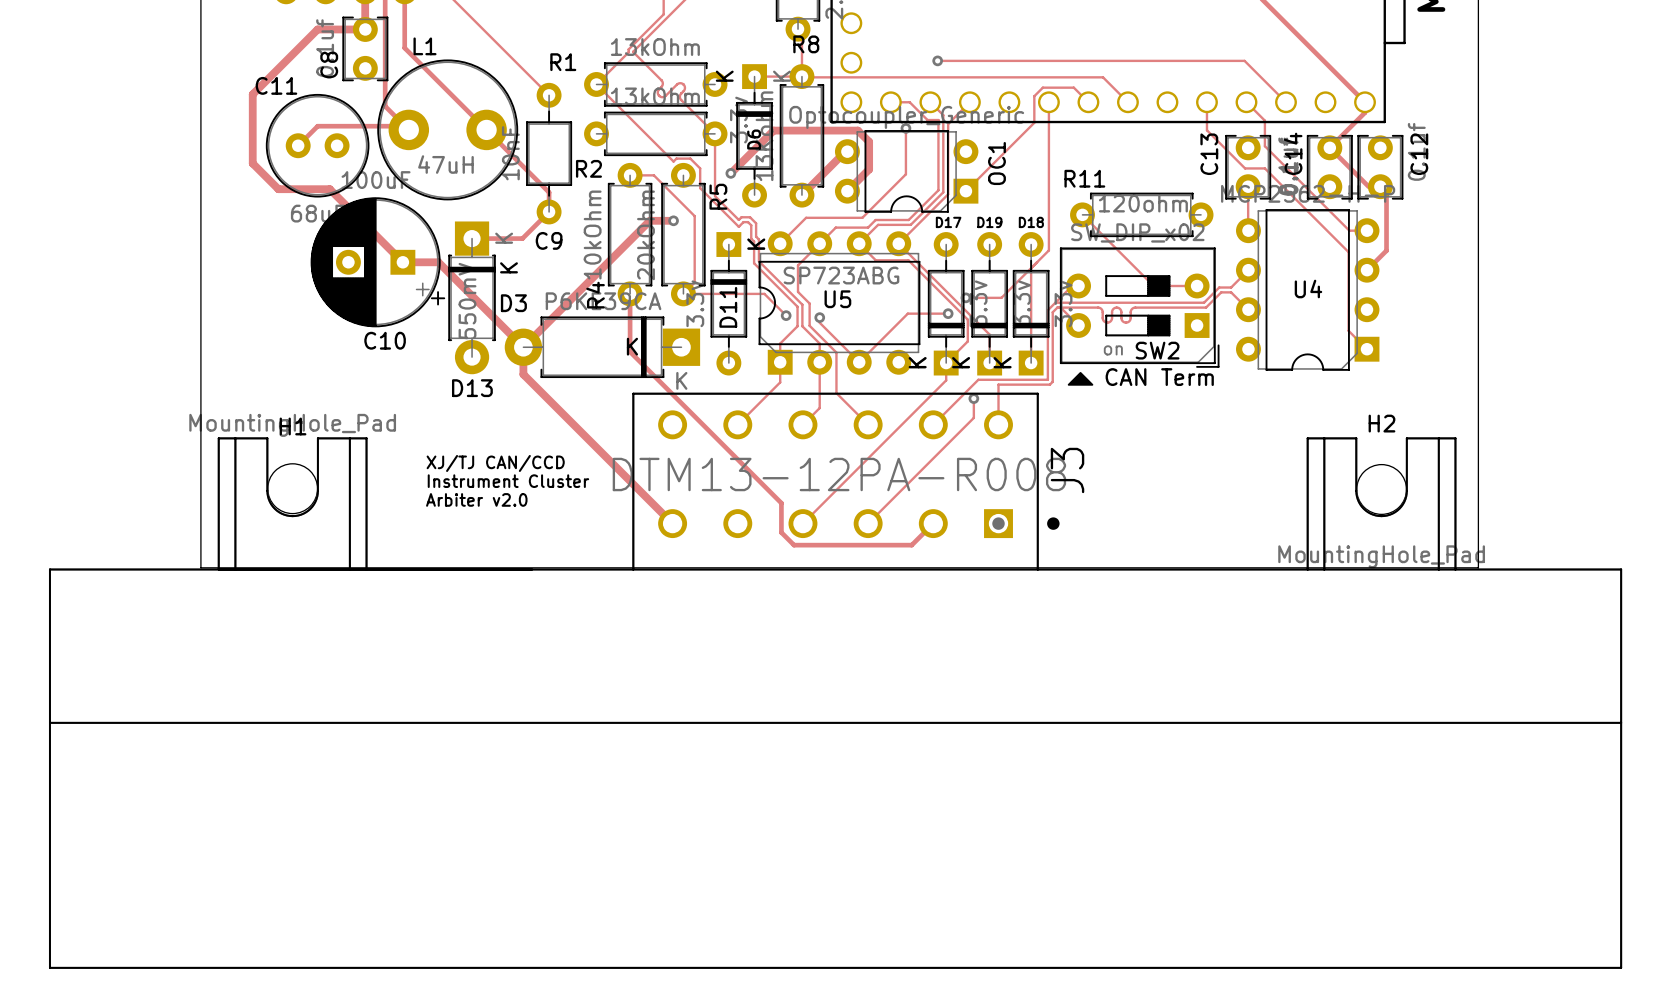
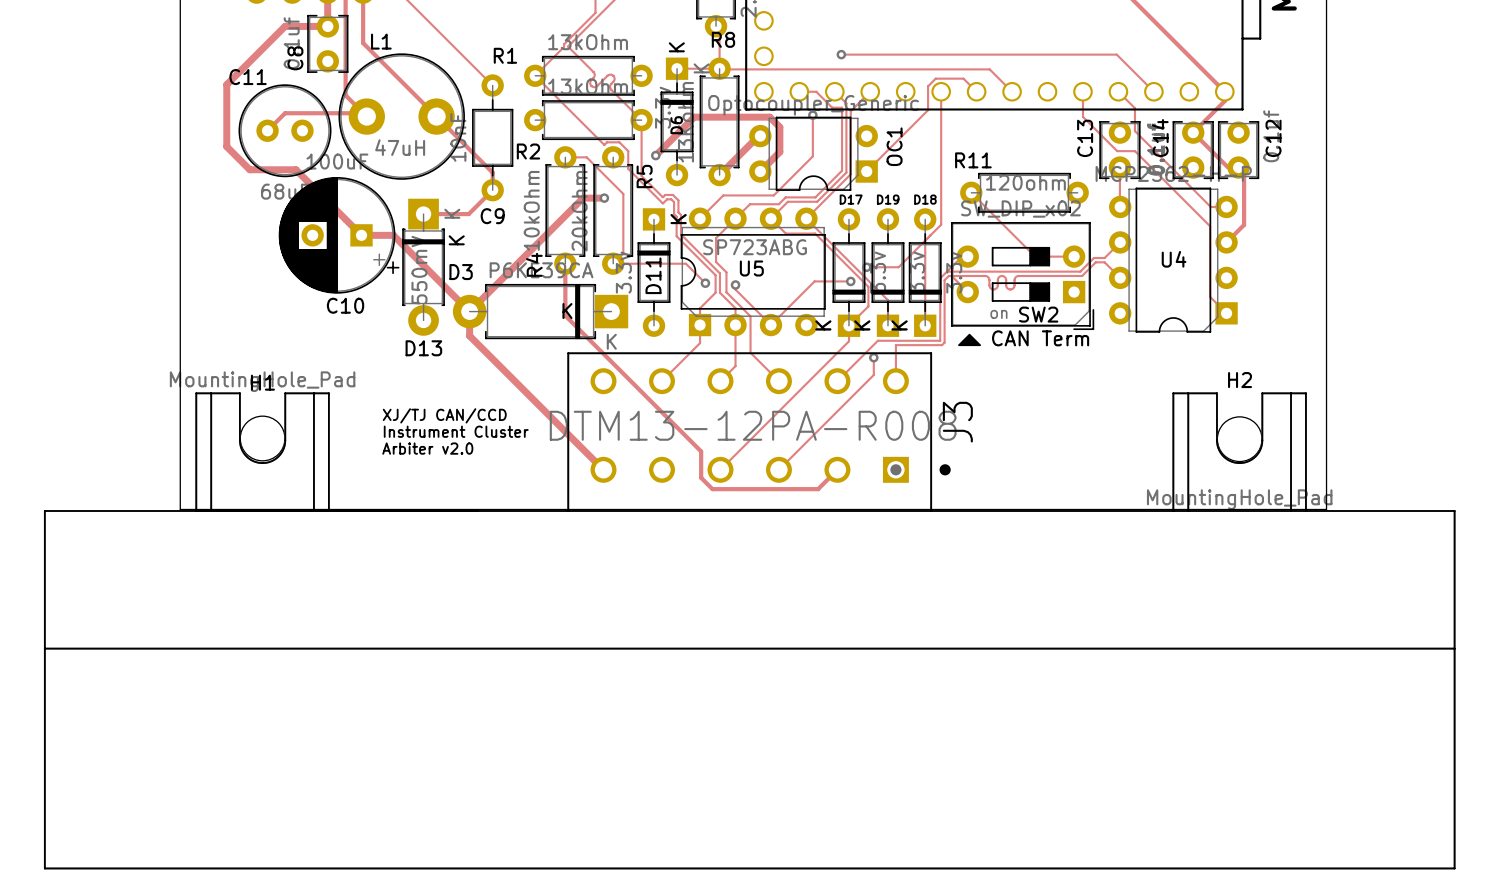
D6 text position: K (724, 76) -> K (676, 47)

